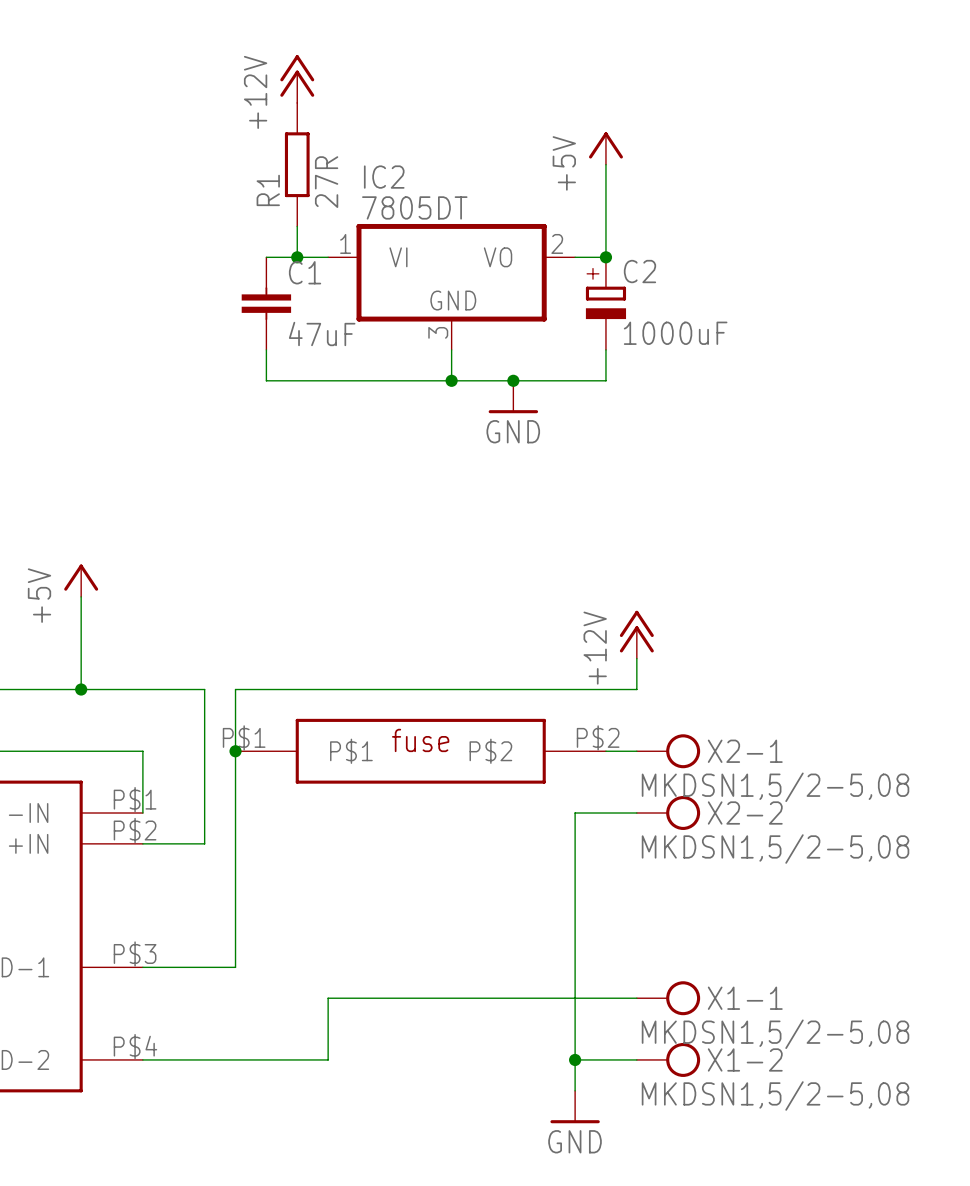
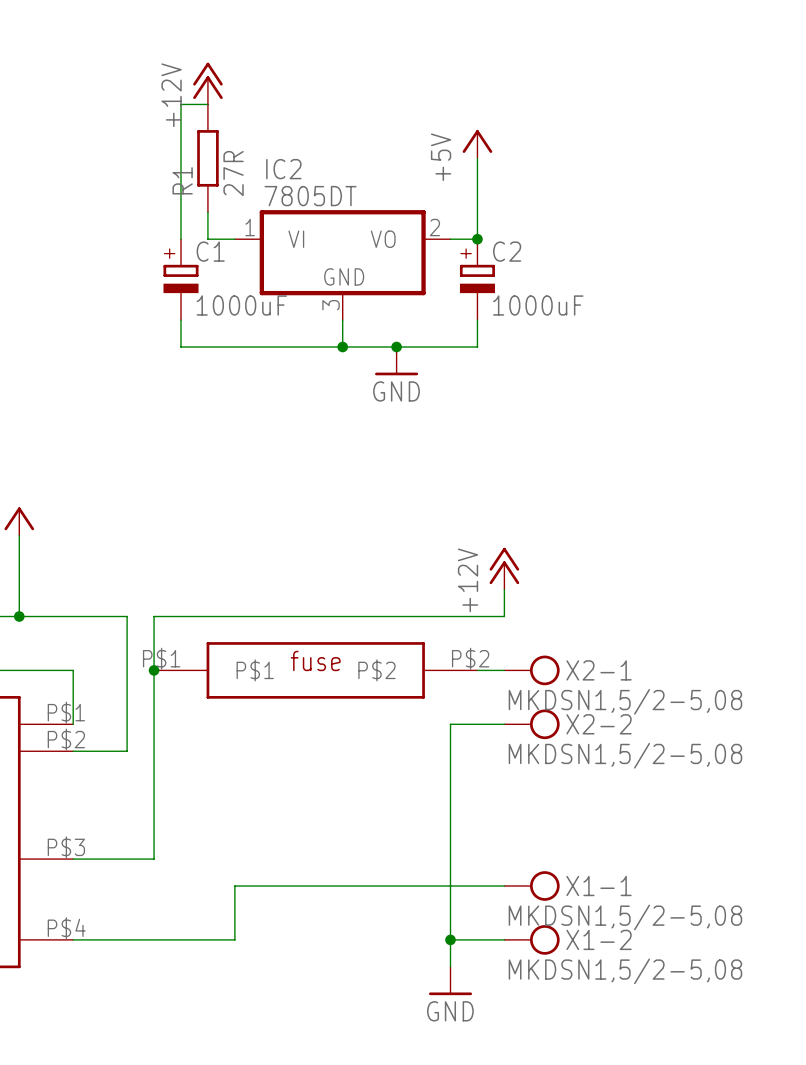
C1 symbol: [241, 257, 292, 350] -> [163, 239, 199, 321]
wire: (266, 257) (297, 257) -> (181, 239) (181, 104) (207, 104)
junction: (297, 257) -> none
C1 value: 47uF (322, 333) -> 1000uF (241, 305)

